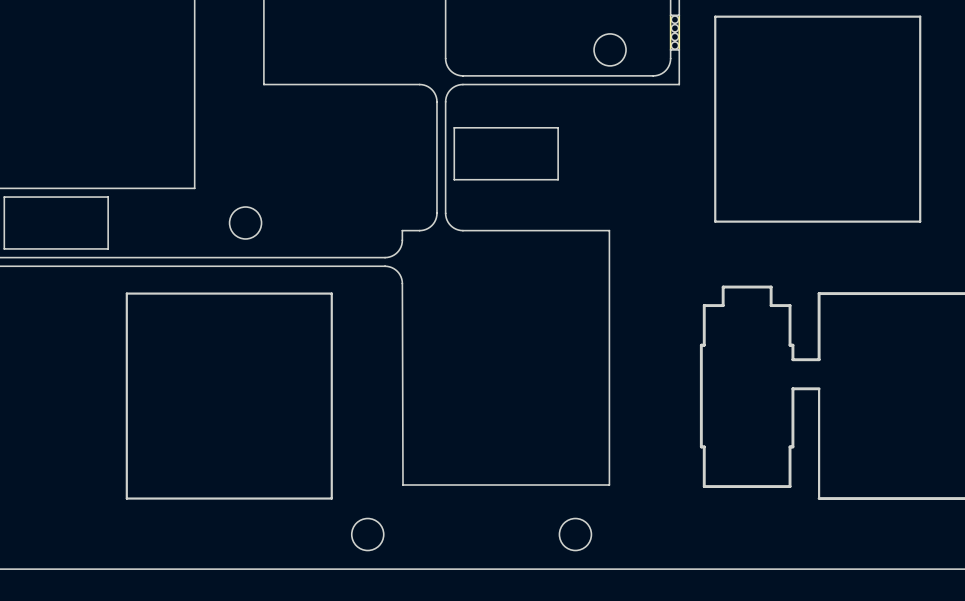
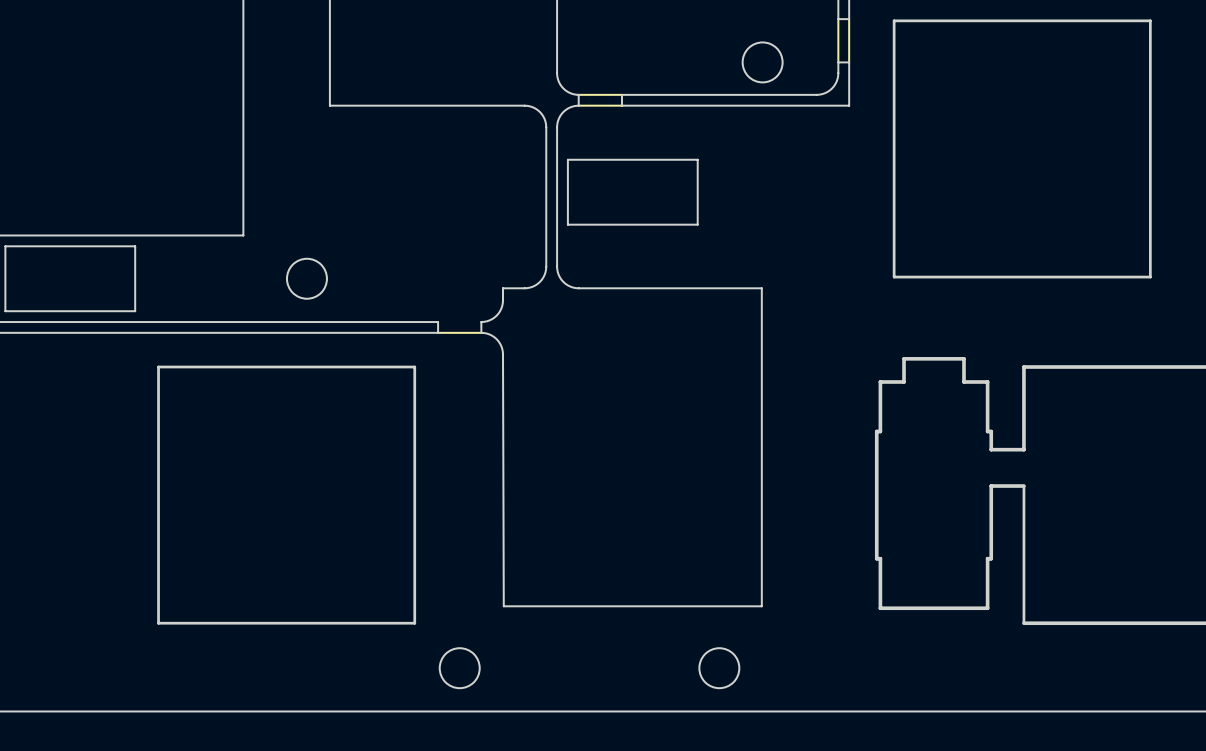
part: (674, 19) -> none
part: (674, 28) -> none
part: (674, 36) -> none
part: (674, 45) -> none
line: none -> (621, 94) (578, 94)
board edge: (497, 75) (462, 75) -> (578, 105) (578, 94)
line: none -> (621, 105) (578, 105)
board edge: (497, 84) (462, 84) -> (621, 105) (621, 94)
board edge: (385, 257) (350, 257) -> (438, 332) (438, 322)
line: none -> (481, 332) (438, 332)
board edge: (385, 266) (350, 266) -> (481, 332) (481, 322)

